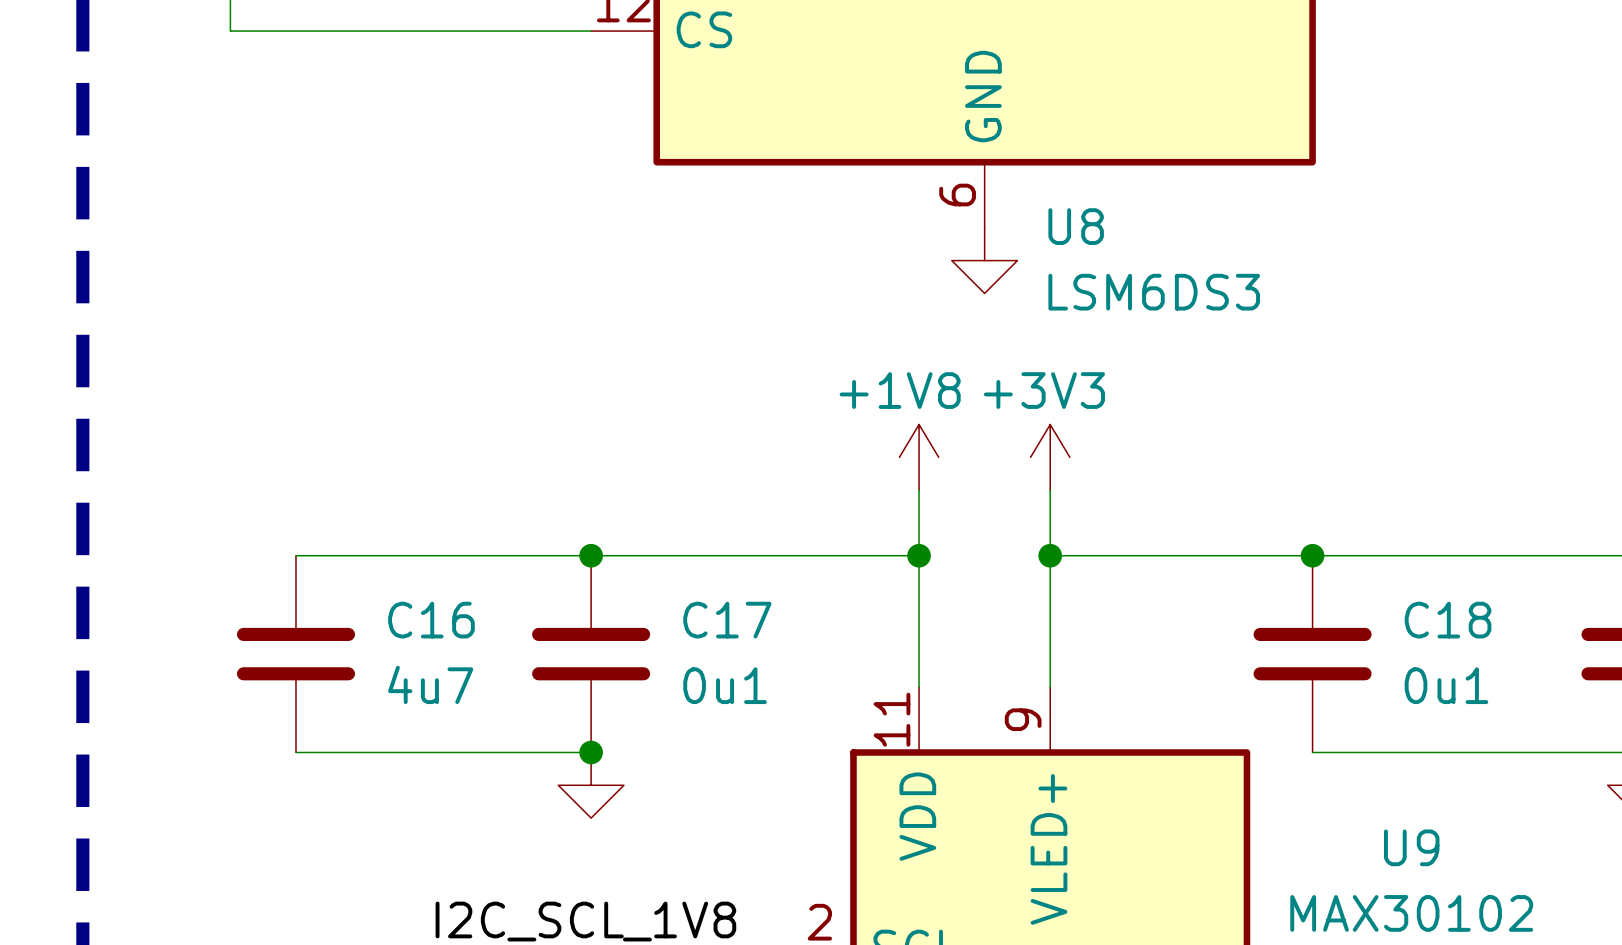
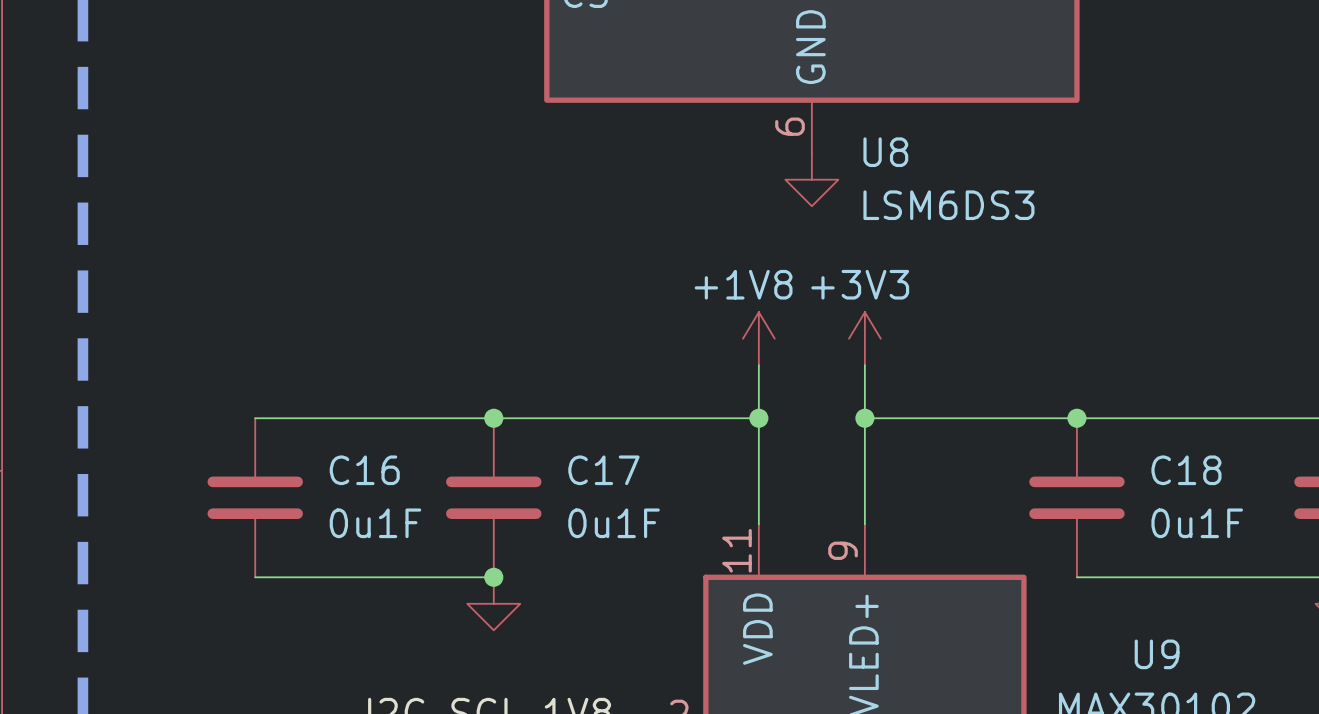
C16 value: 4u7 (430, 684) -> 0u1F (375, 523)
C17 value: 0u1 (725, 685) -> 0u1F (614, 523)
C18 value: 0u1 (1446, 685) -> 0u1F (1197, 523)

